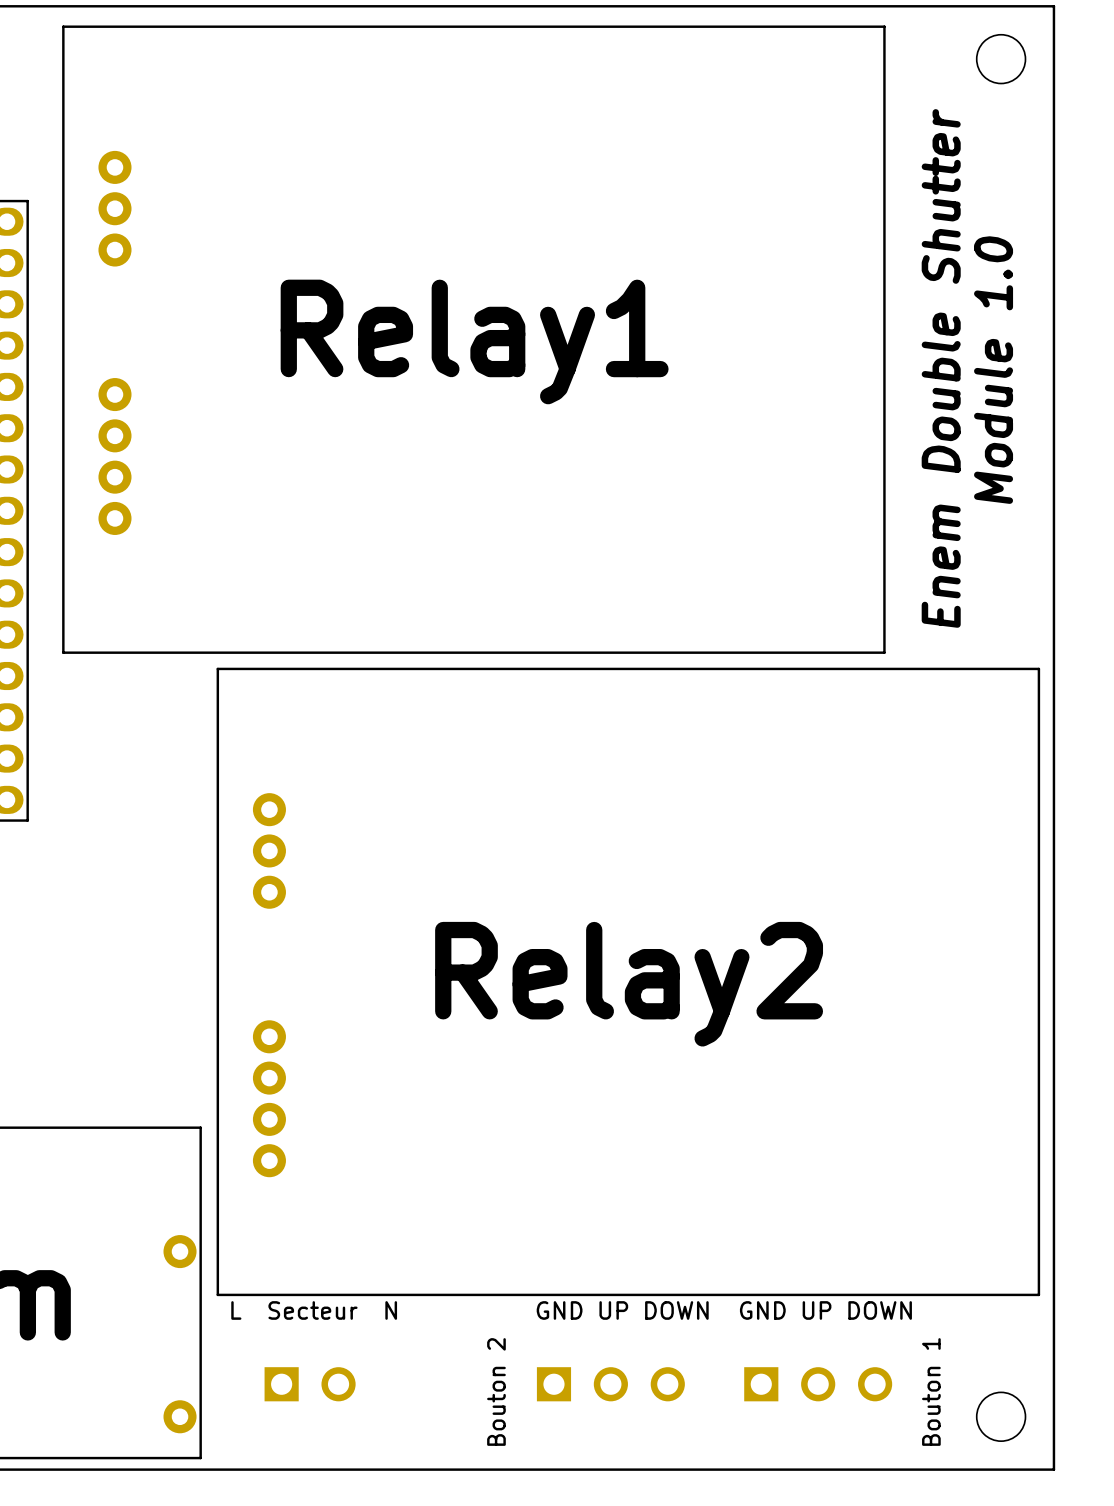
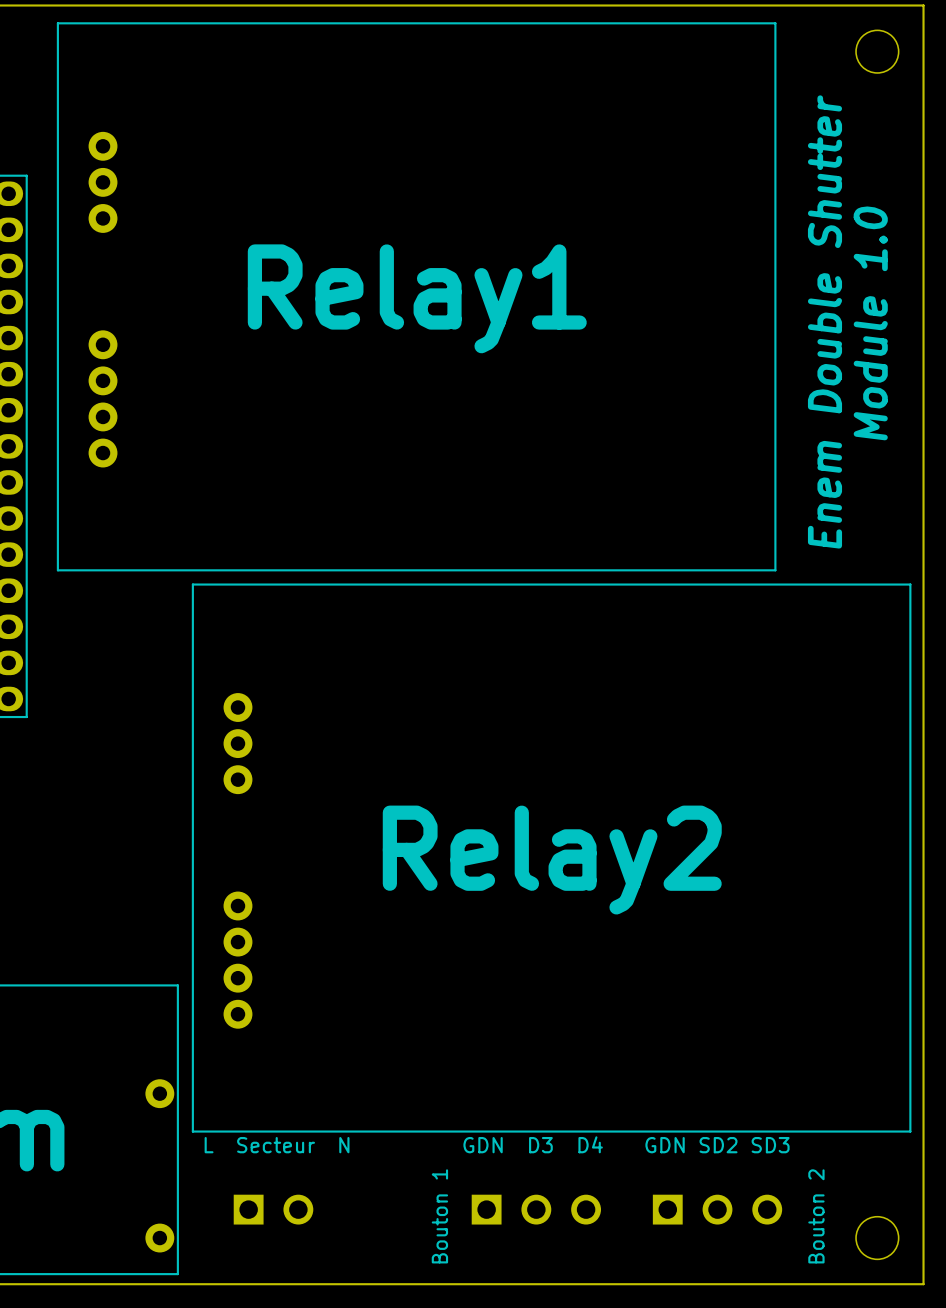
text: GND UP DOWN (622, 1310) -> GDN D3 D4 (533, 1144)
text: GND UP DOWN (825, 1310) -> GDN SD2 SD3 (717, 1145)
Bouton 2 name: Bouton 2 (496, 1391) -> Bouton 1 (439, 1216)
Bouton 1 name: Bouton 1 (931, 1391) -> Bouton 2 (816, 1216)

